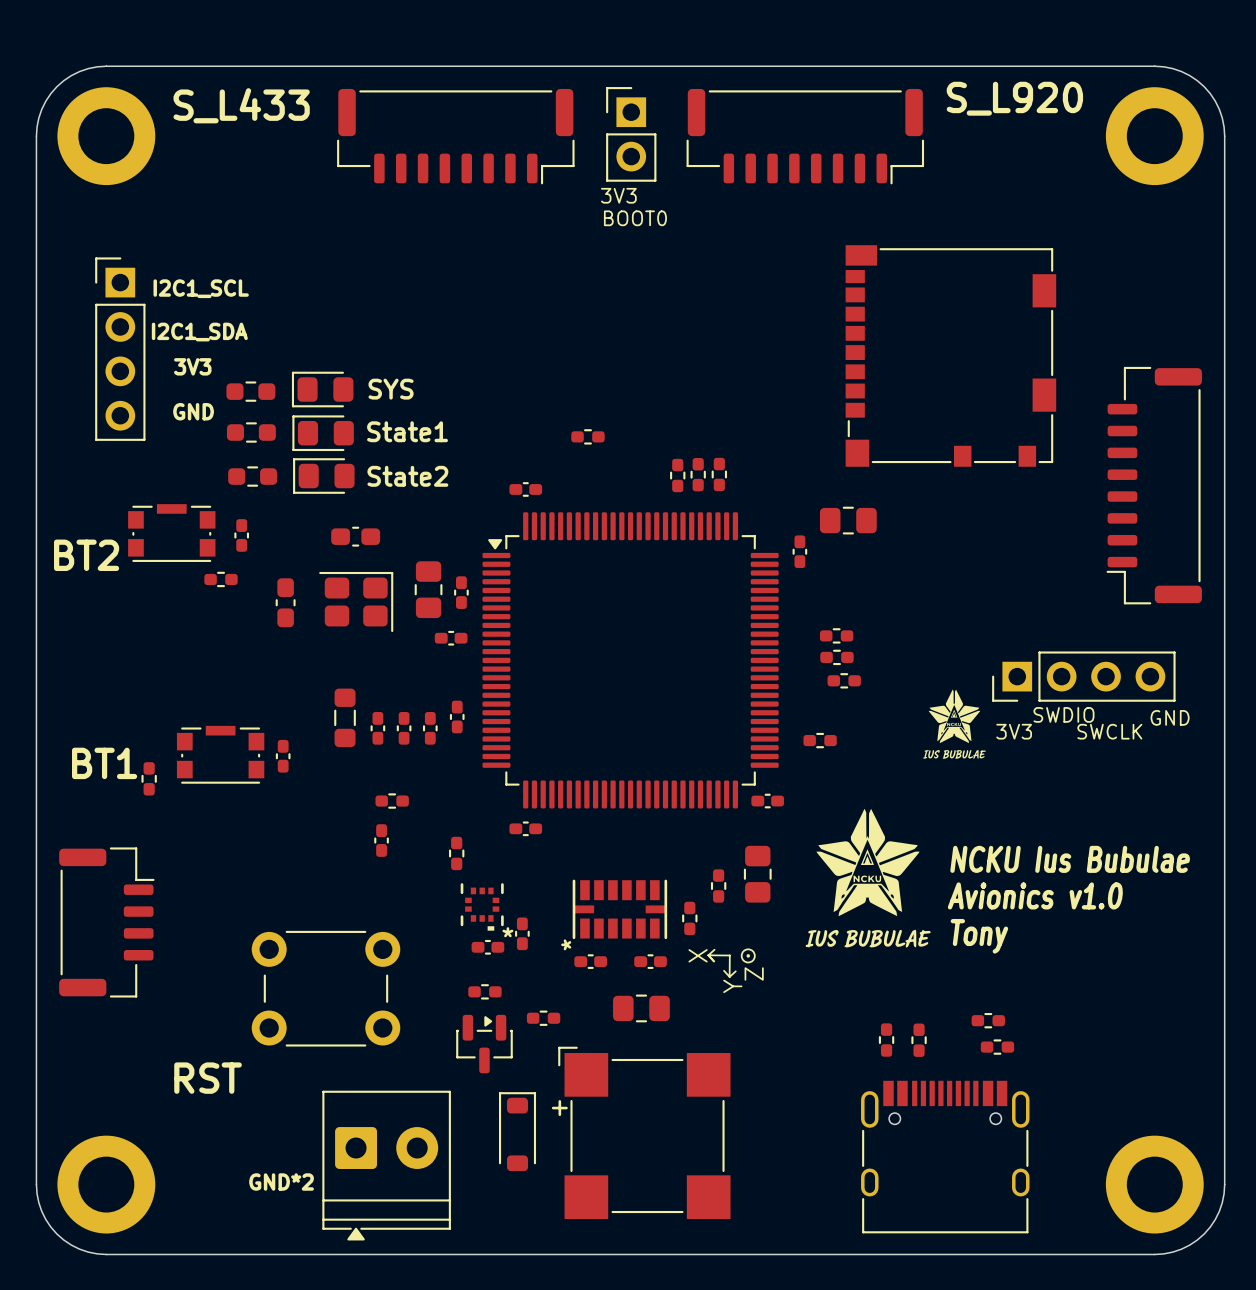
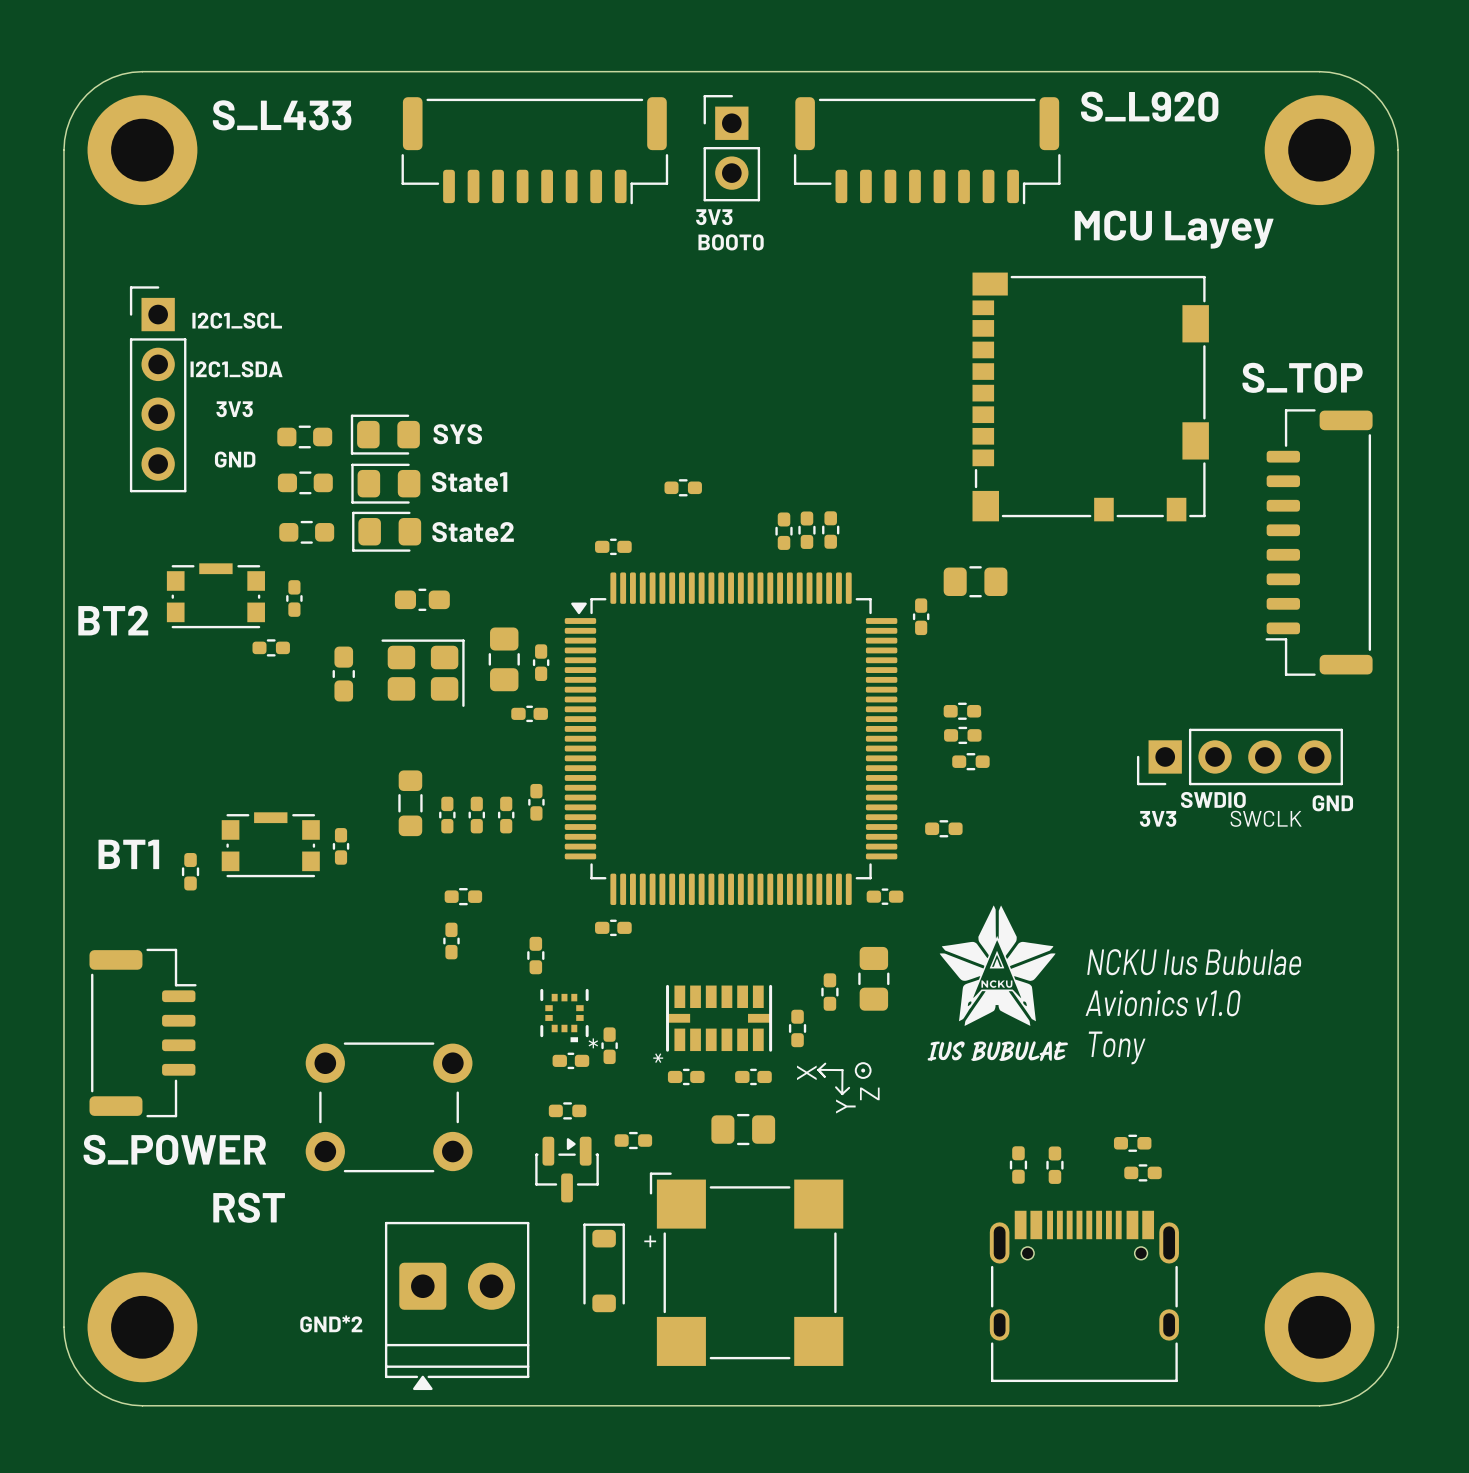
text: none -> MCU Layey (1174, 229)
text: none -> S_TOP (1302, 377)
drawing: [923, 689, 986, 759] -> none
text: none -> S_POWER (174, 1149)

